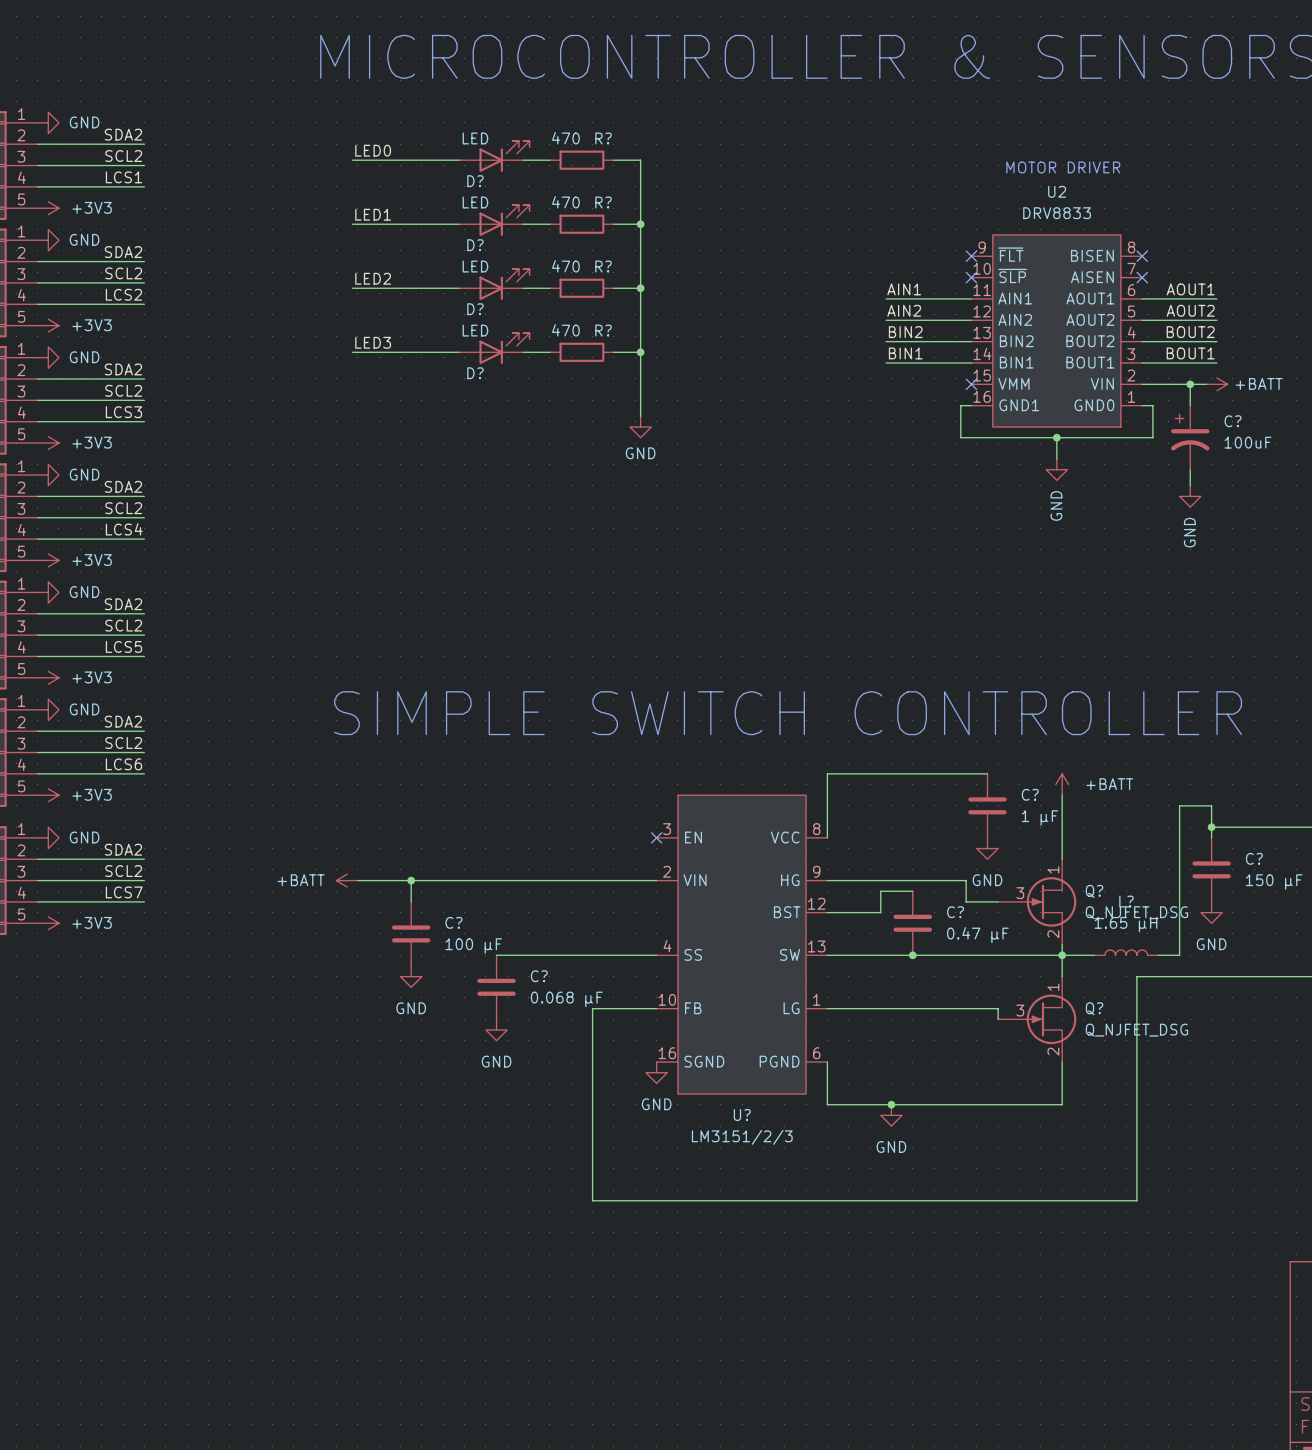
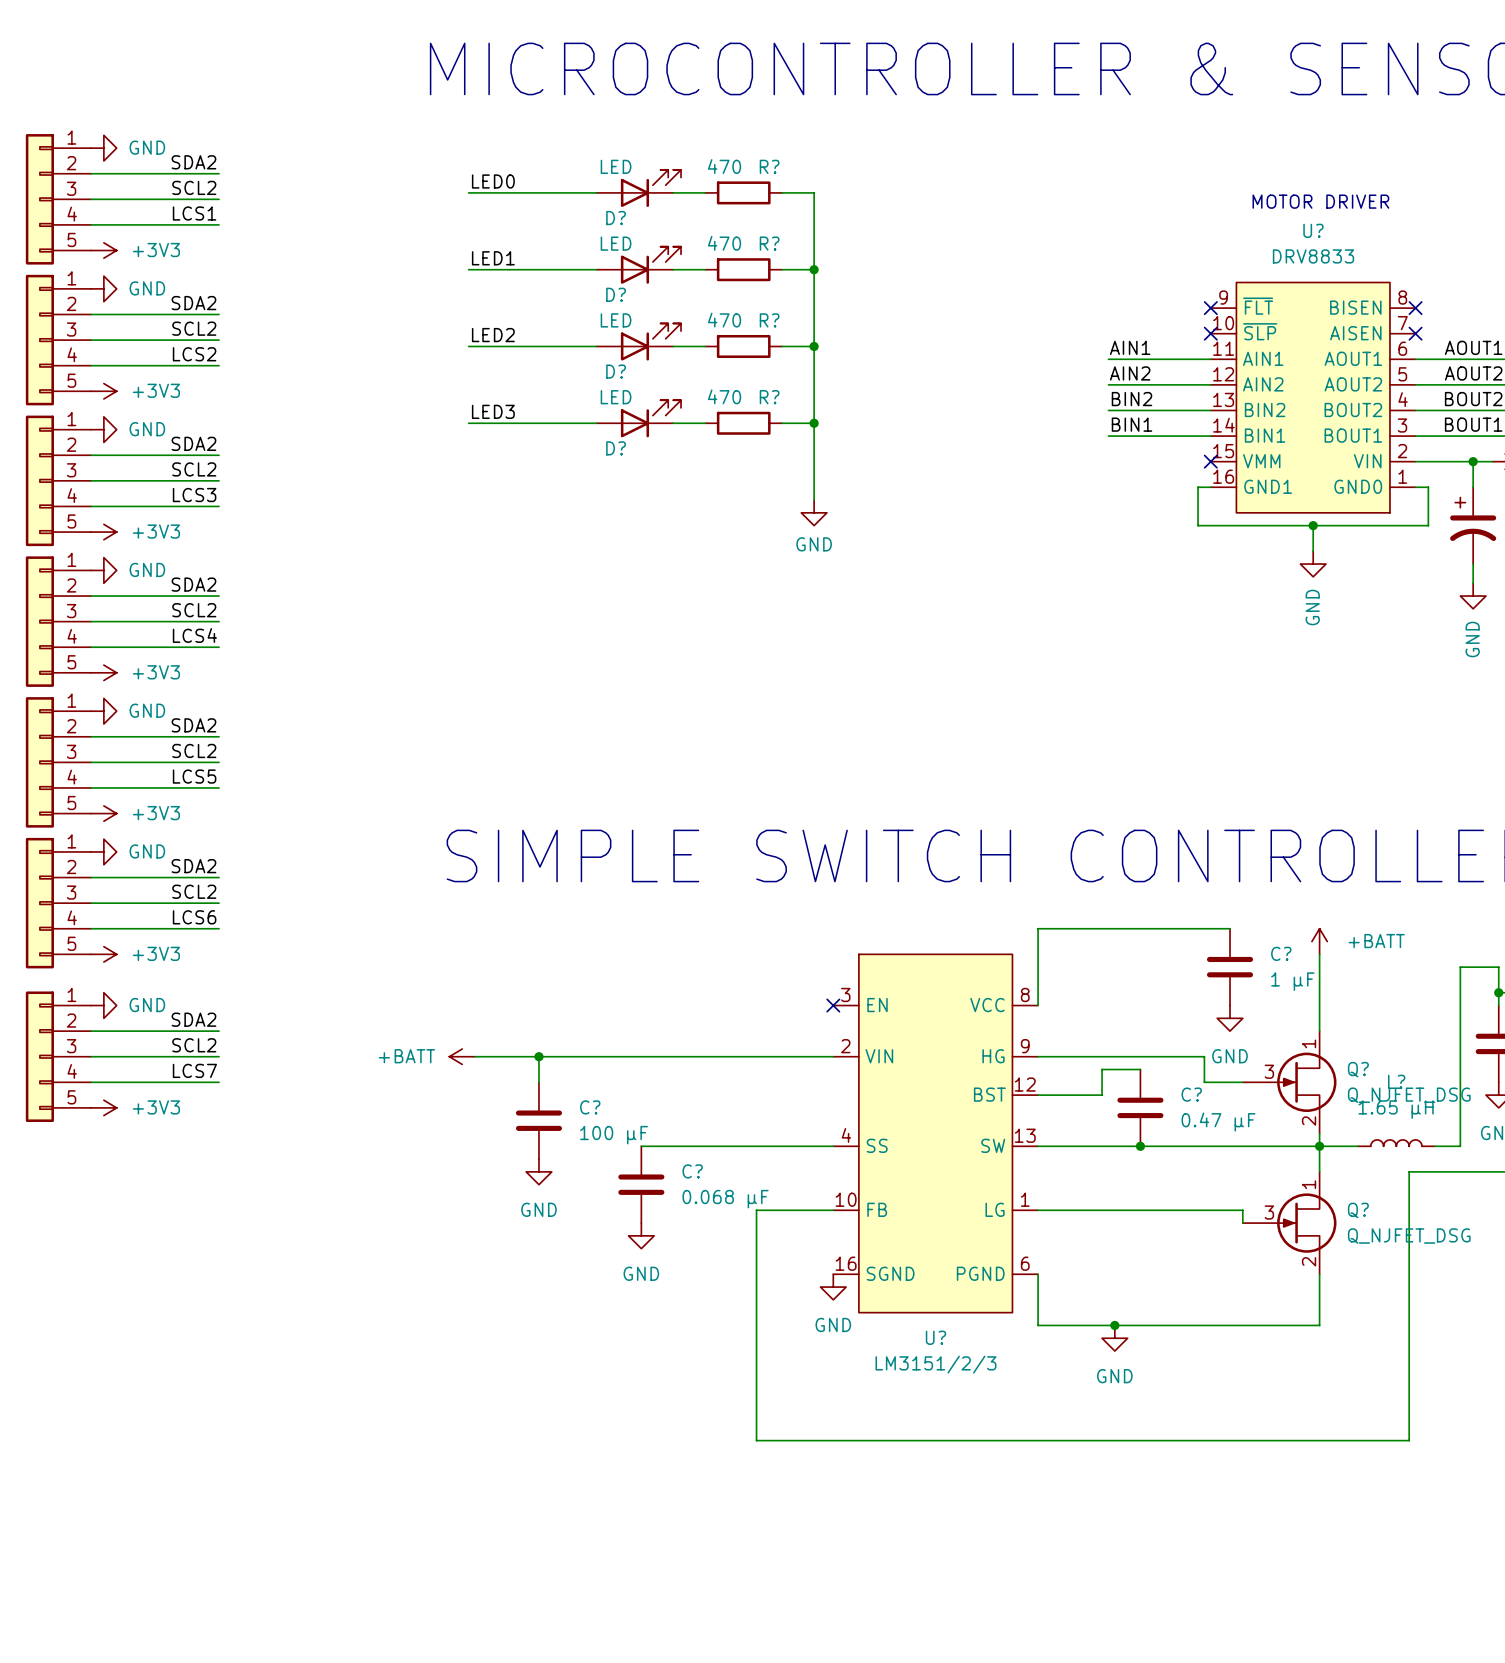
U2 name: U2 (1057, 191) -> U? (1313, 230)

